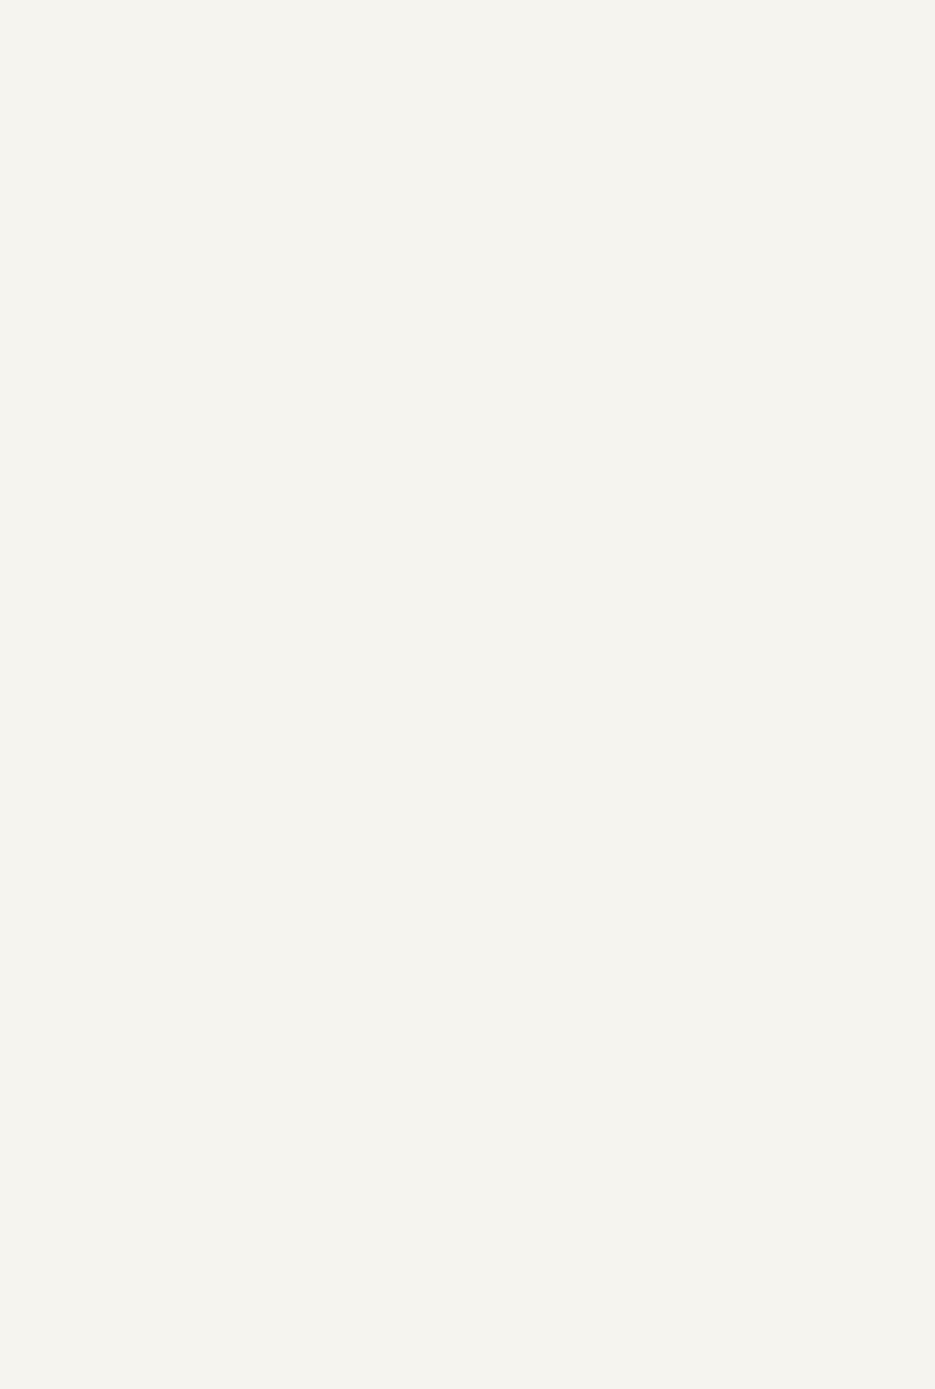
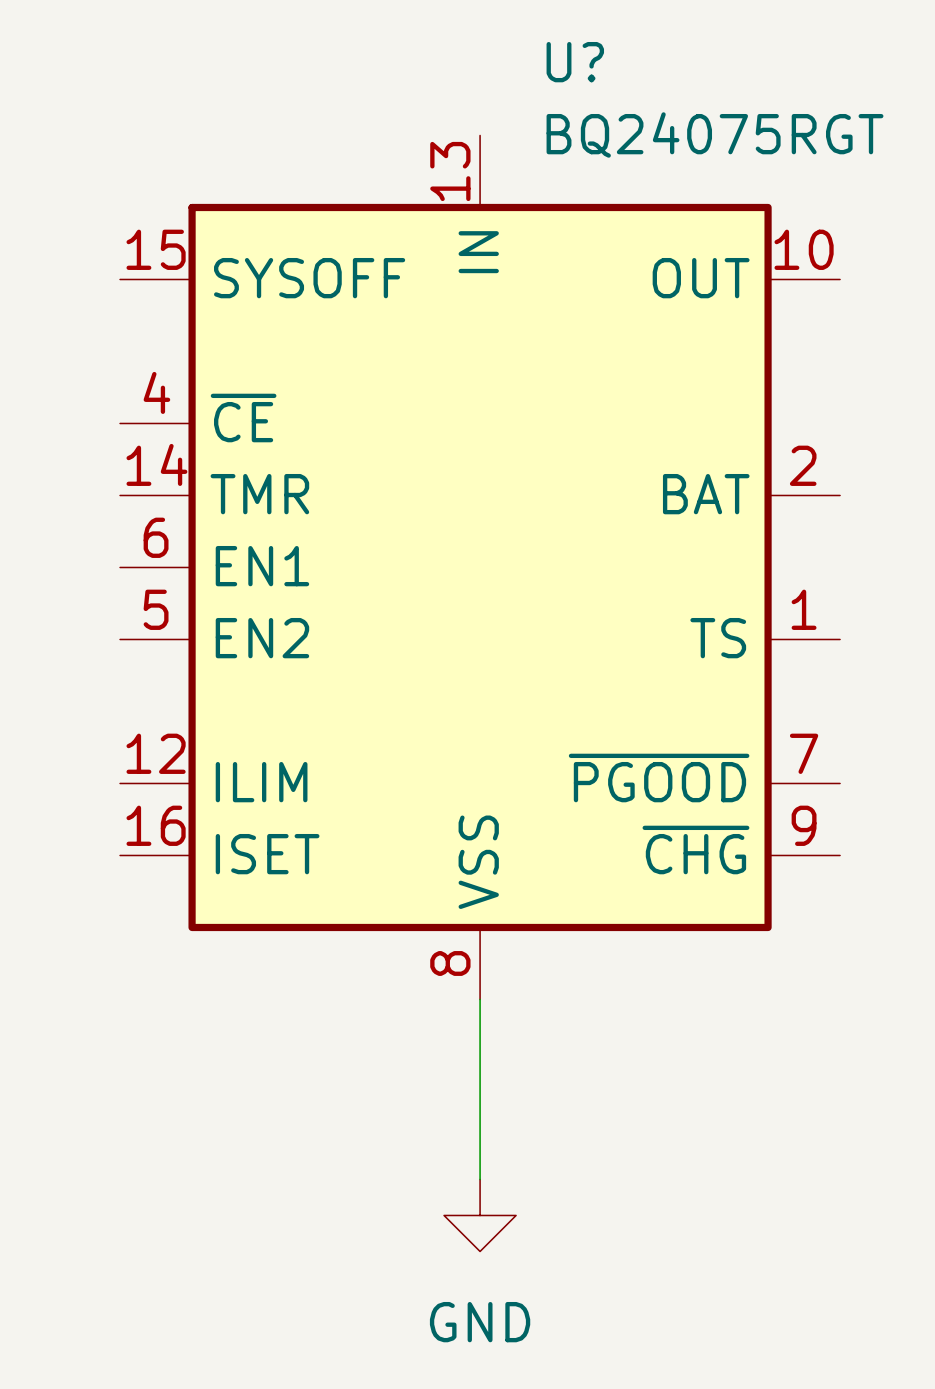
U?: none -> BQ24075RGT (480, 567)
wire: none -> (480, 999) (480, 1179)
power symbol: none -> GND (480, 1215)

